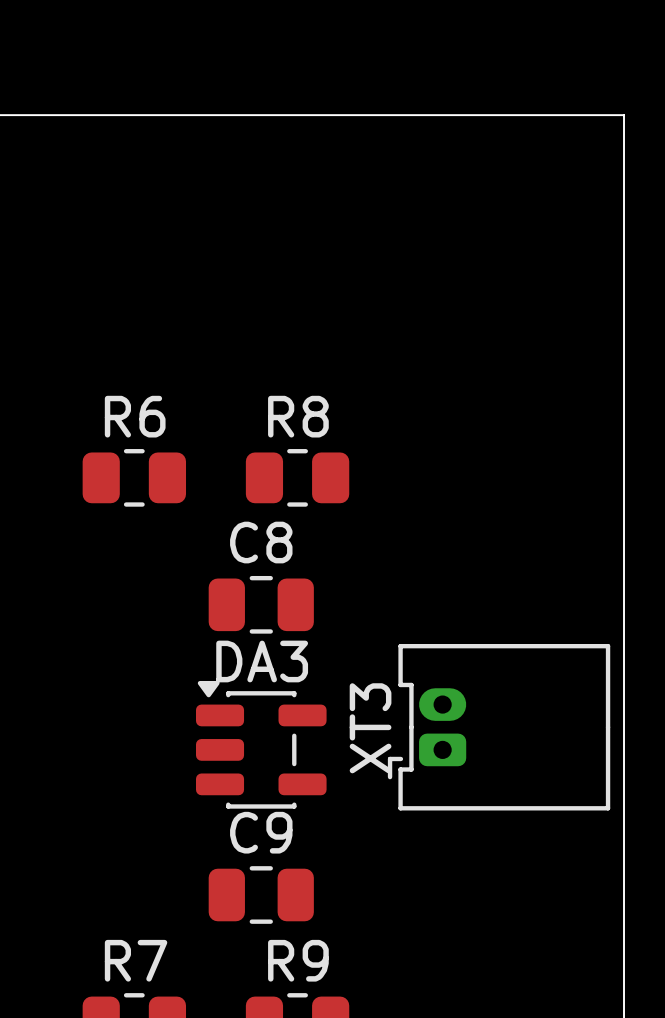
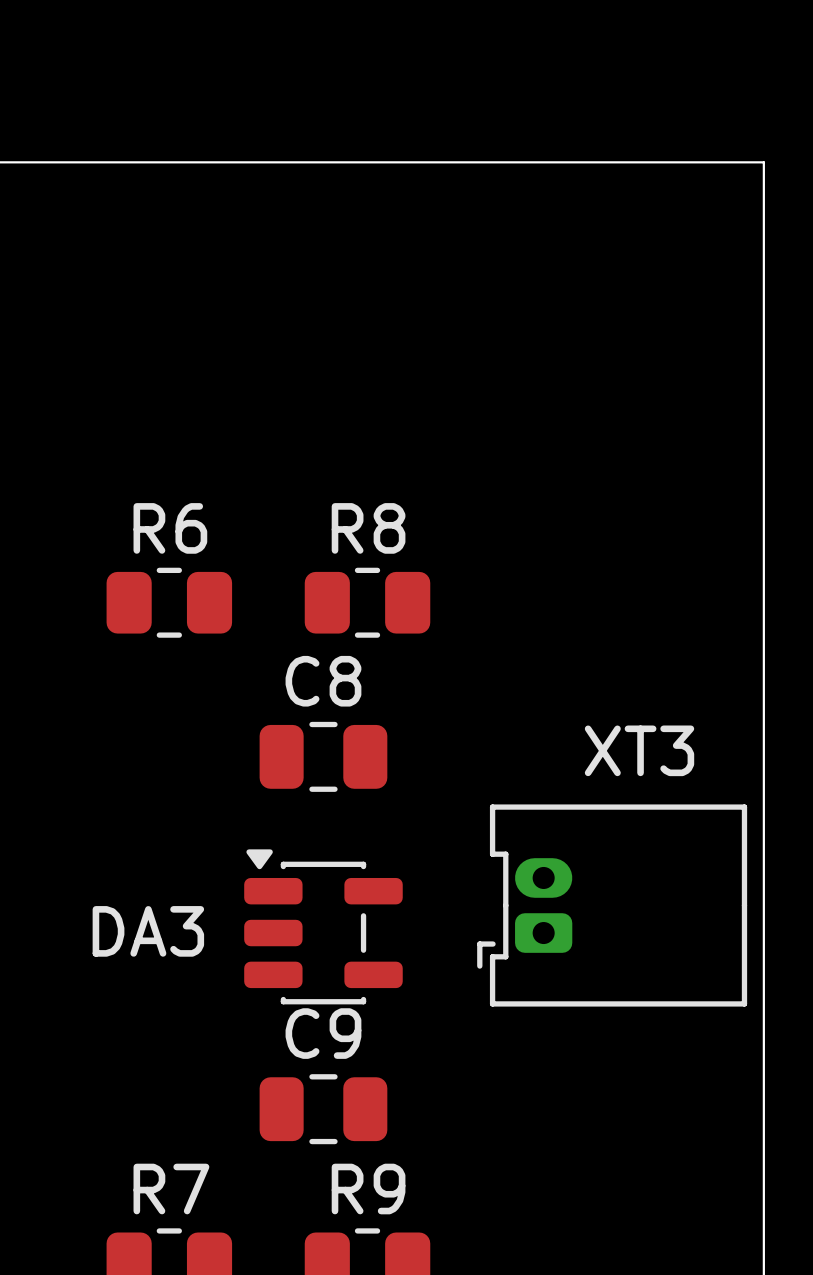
DA3 name position: DA3 (262, 661) -> DA3 (148, 931)
XT3 name rotation: 0° (370, 728) -> 90° clockwise (639, 750)
XT3 name position: XT3 (370, 728) -> XT3 (639, 750)

